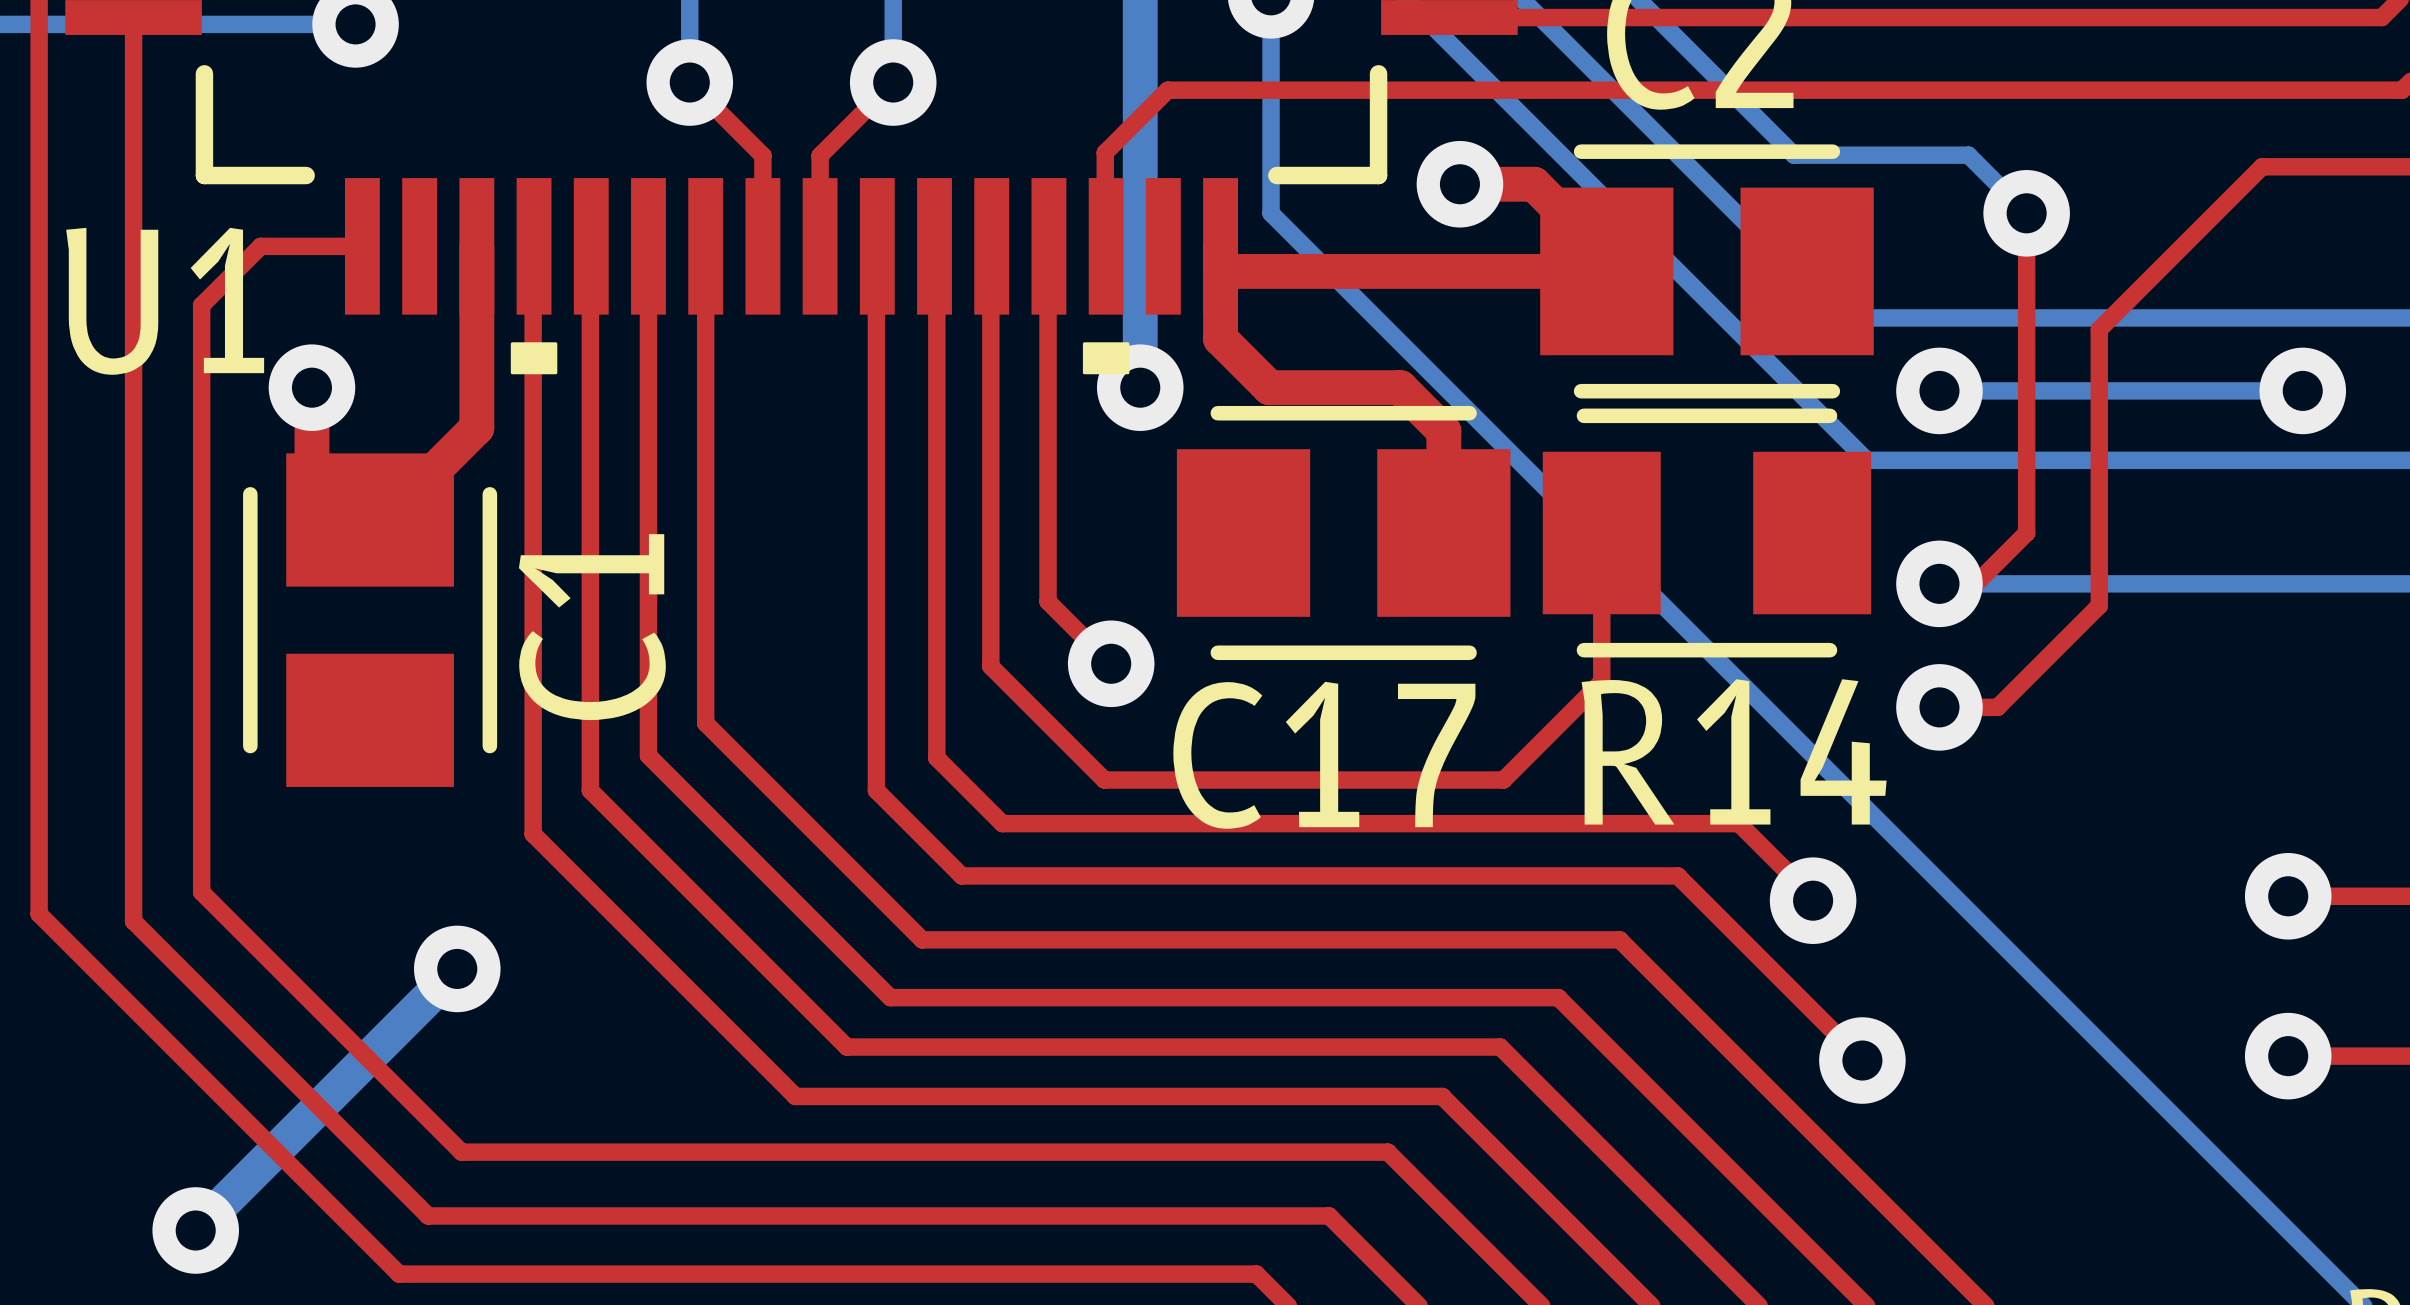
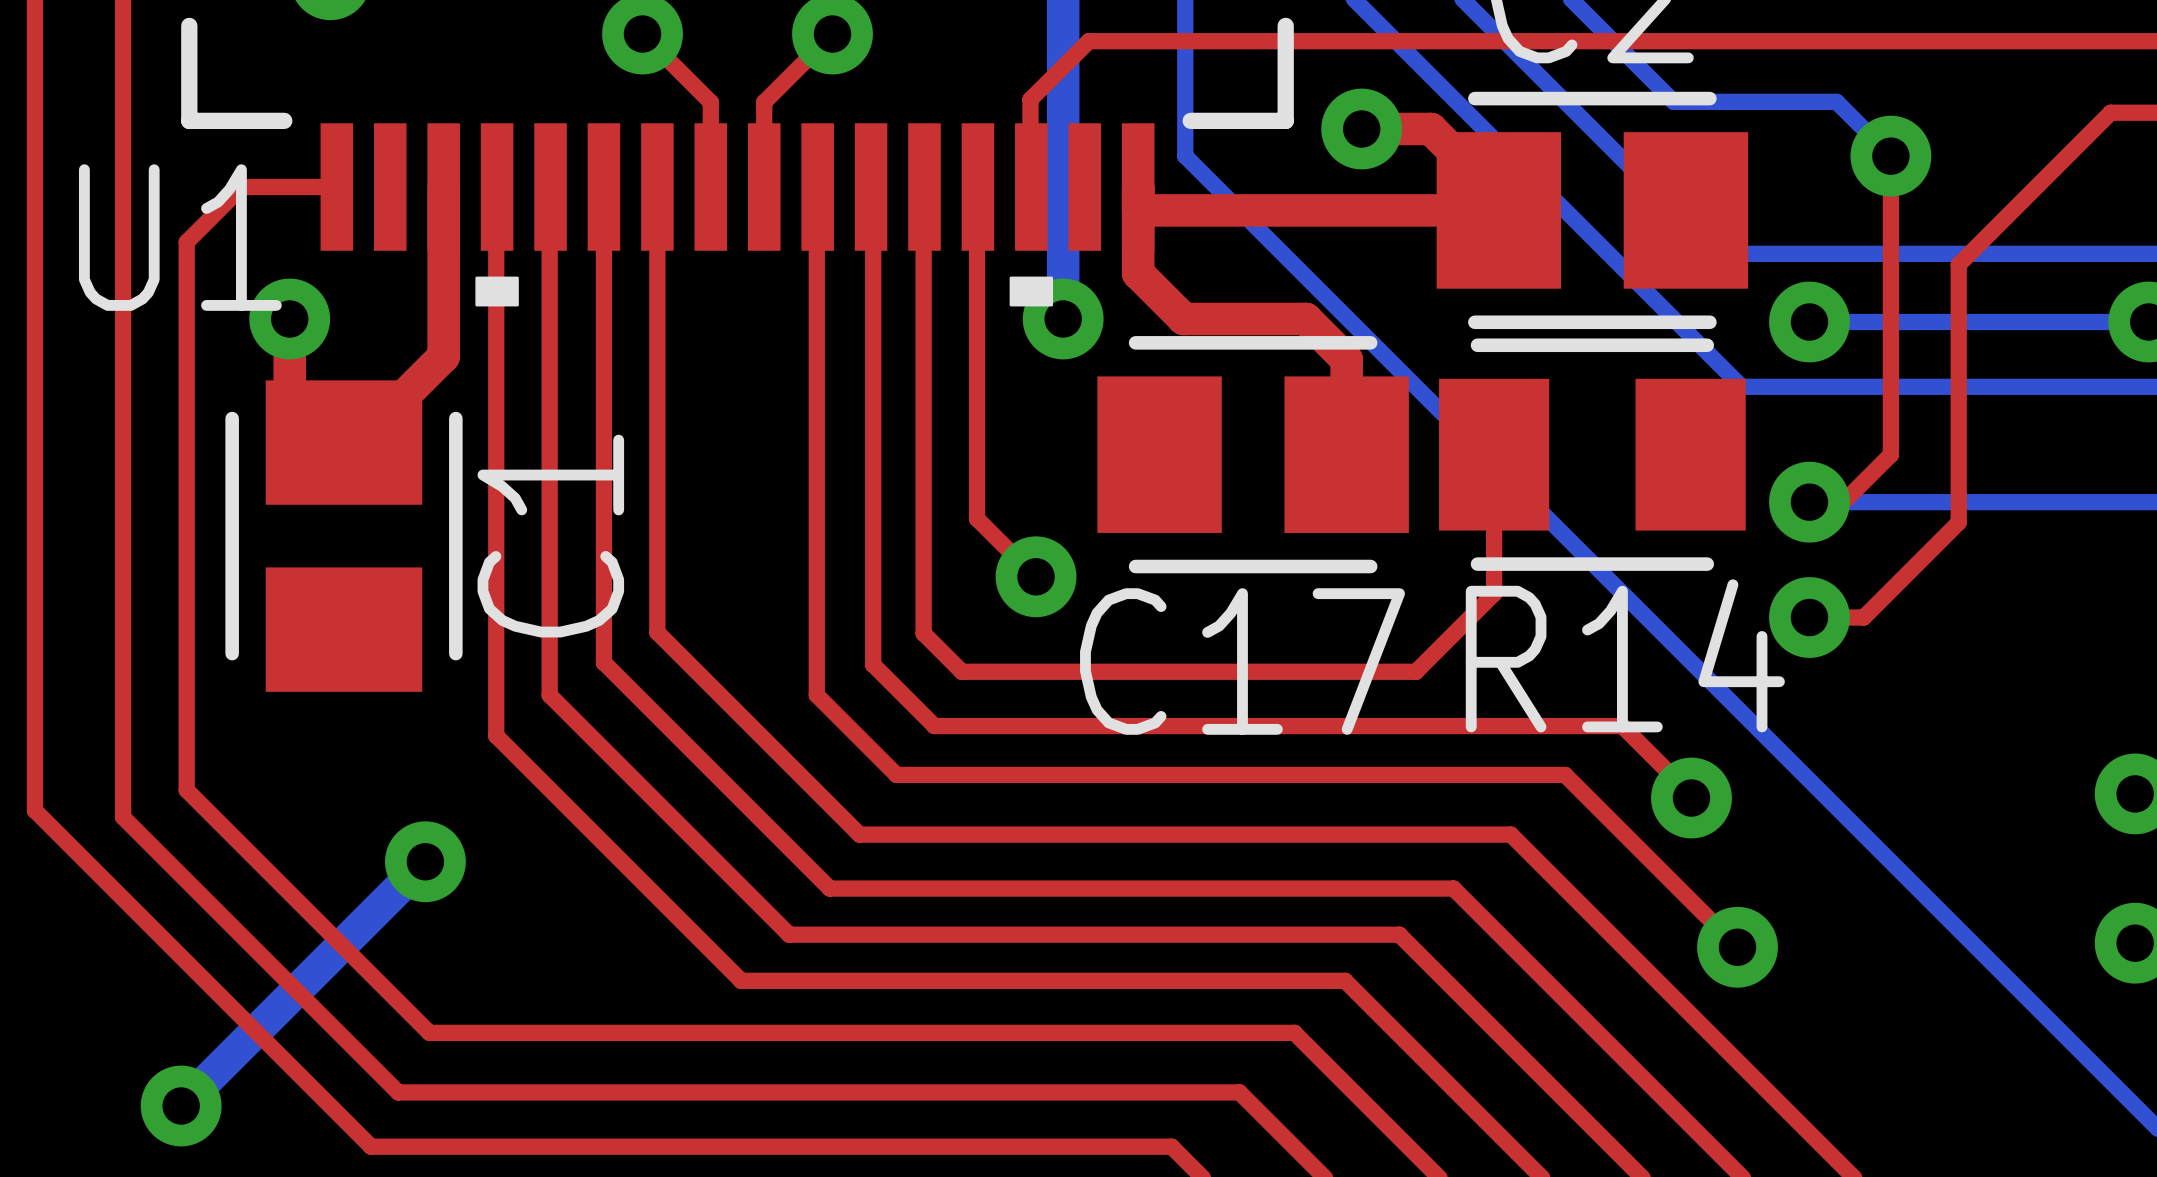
top track: (990, 666) (1104, 780) (1503, 780) (1518, 765) -> (923, 579) (923, 633) (961, 671) (1415, 671)

